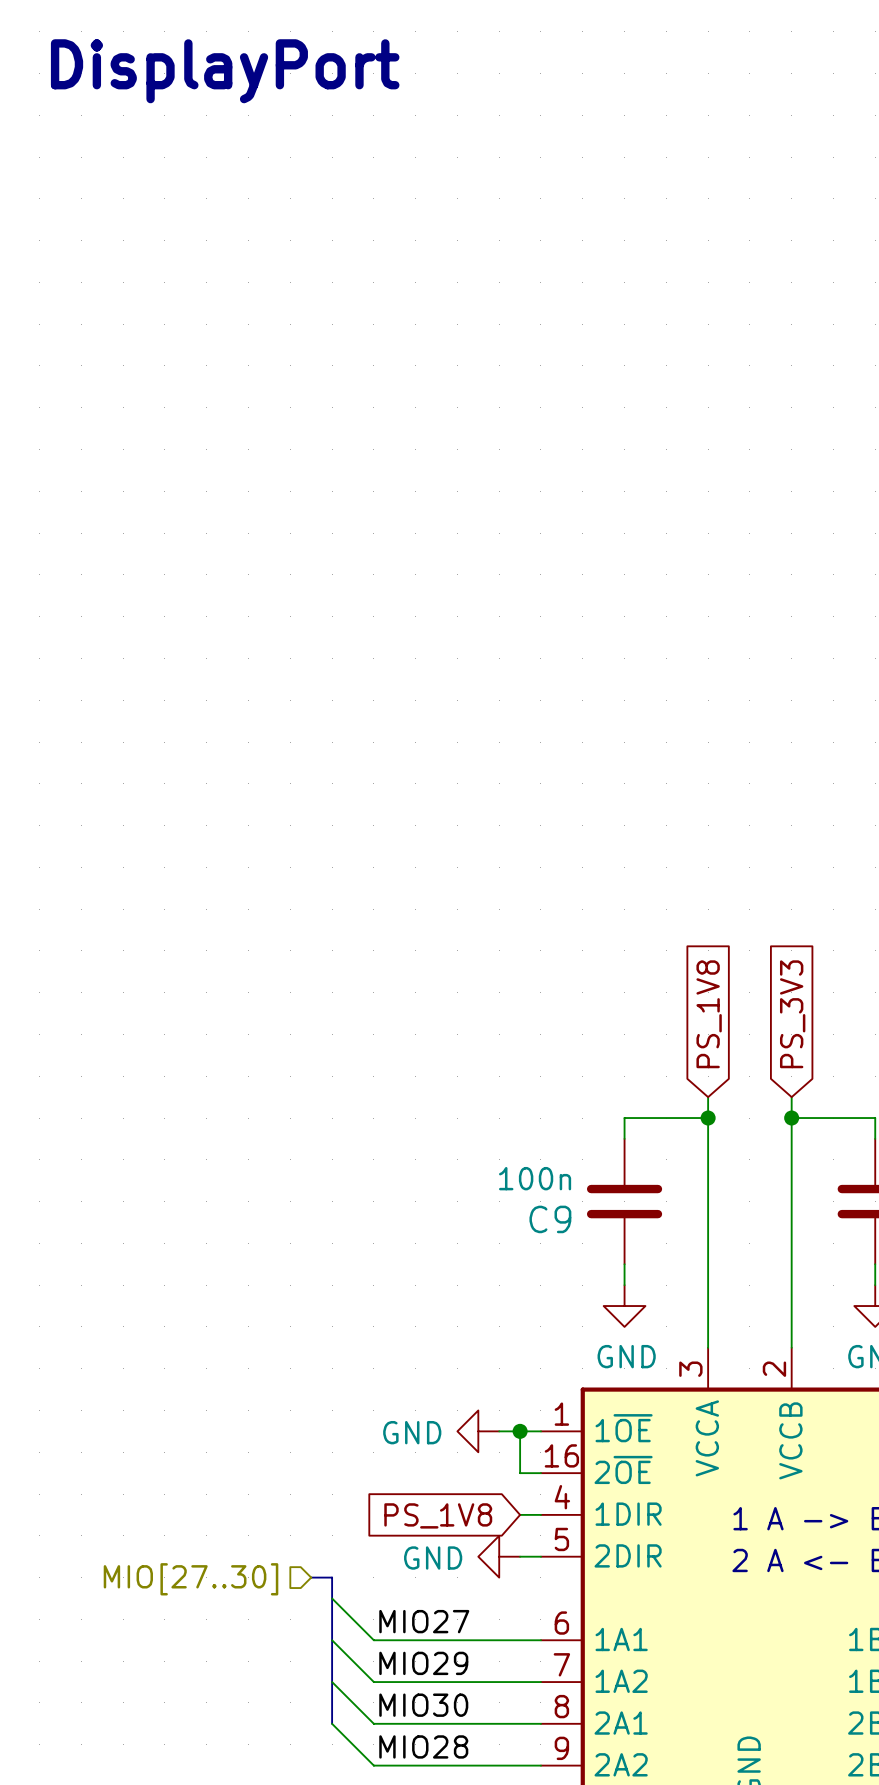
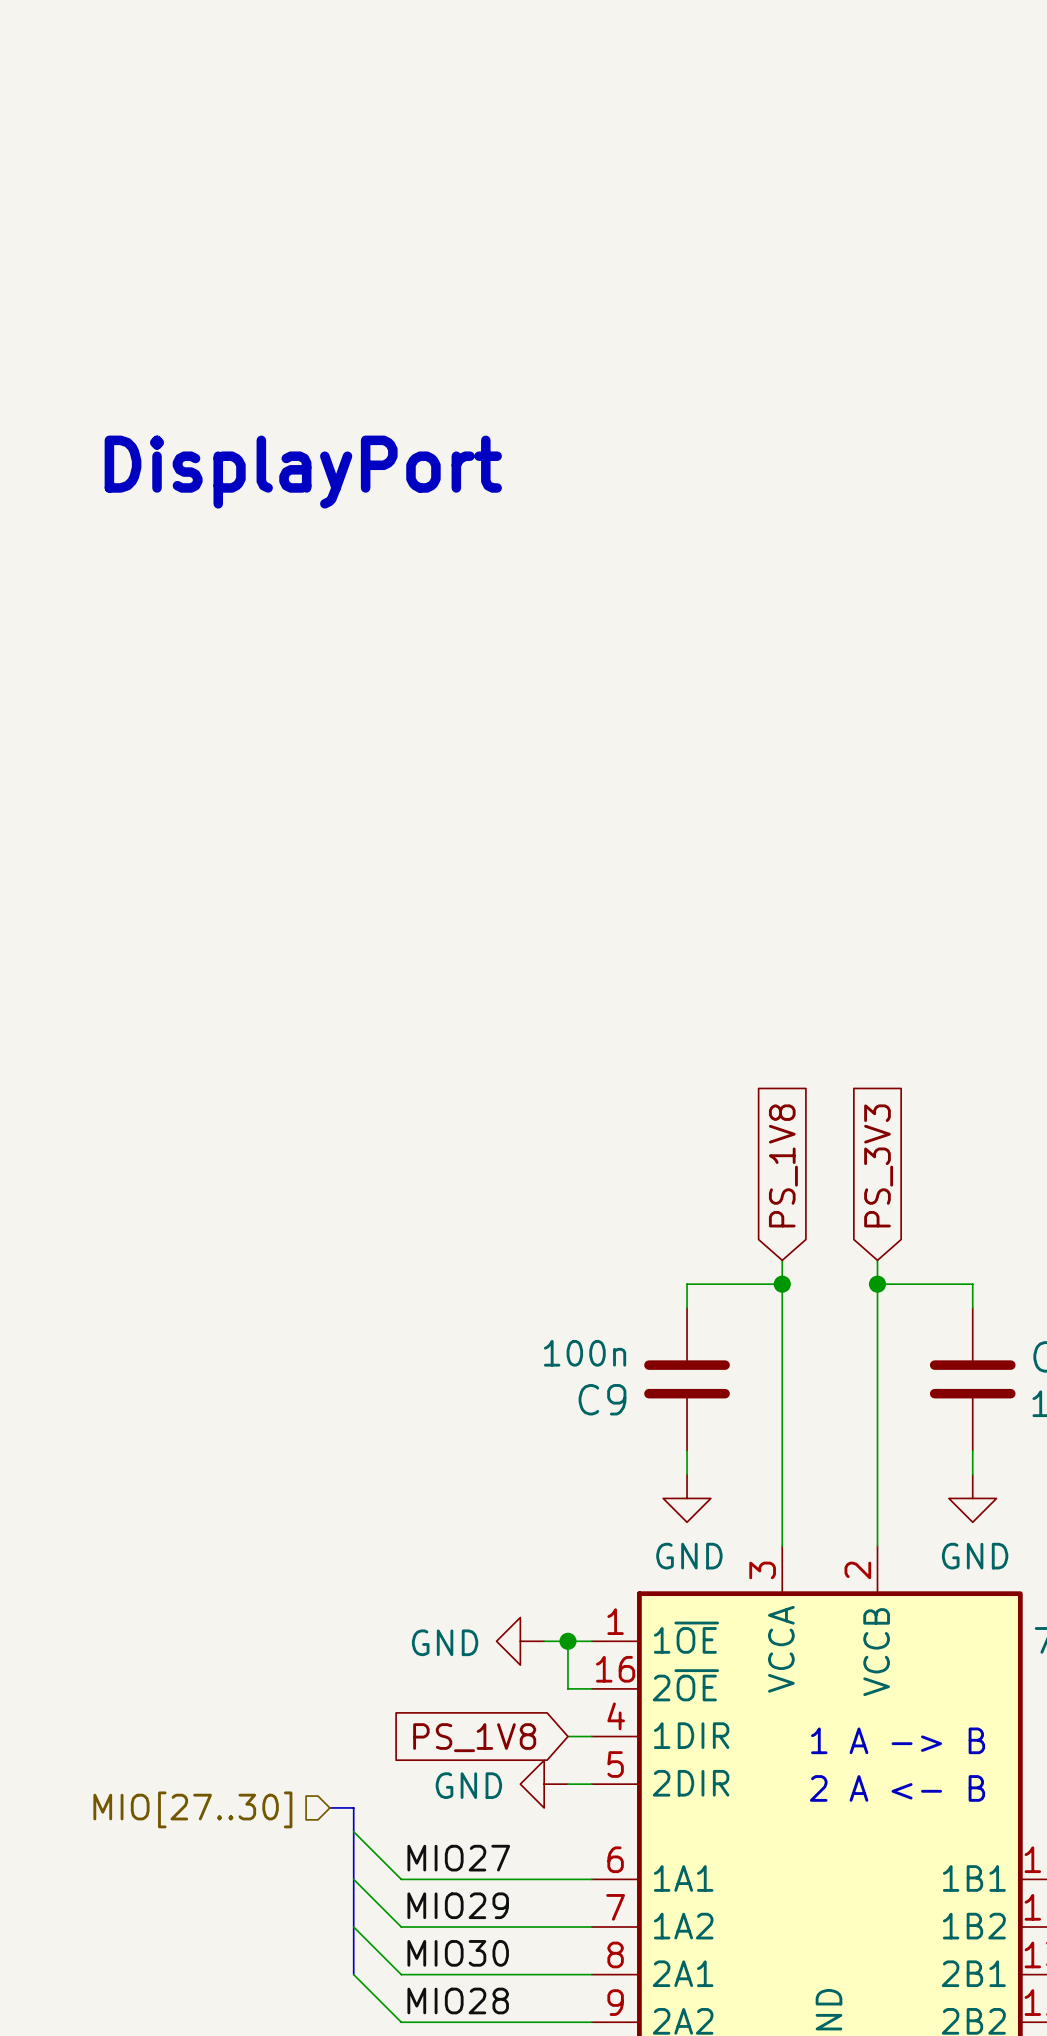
text position: DisplayPort (225, 71) -> DisplayPort (303, 472)

